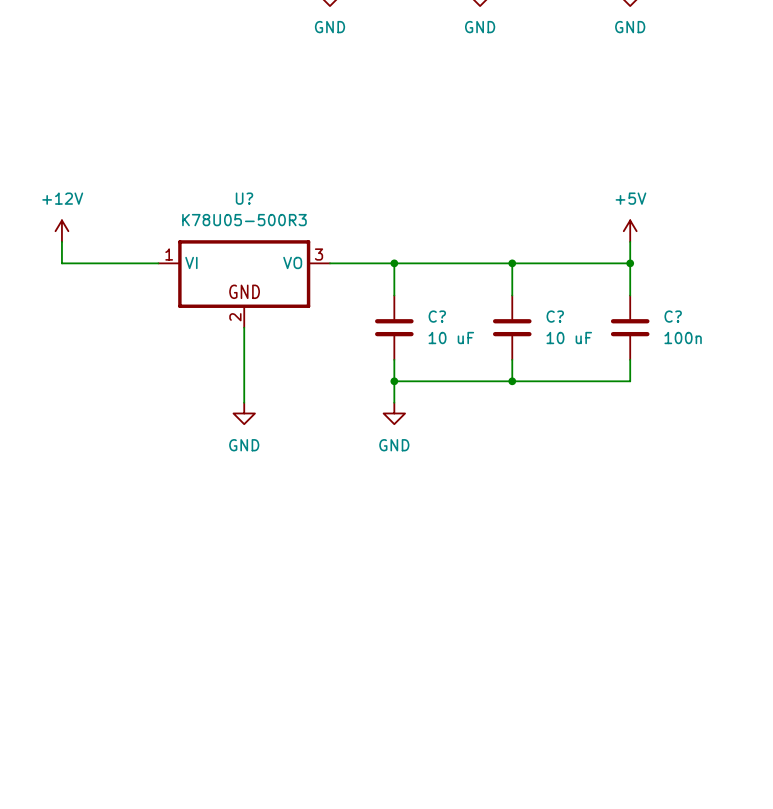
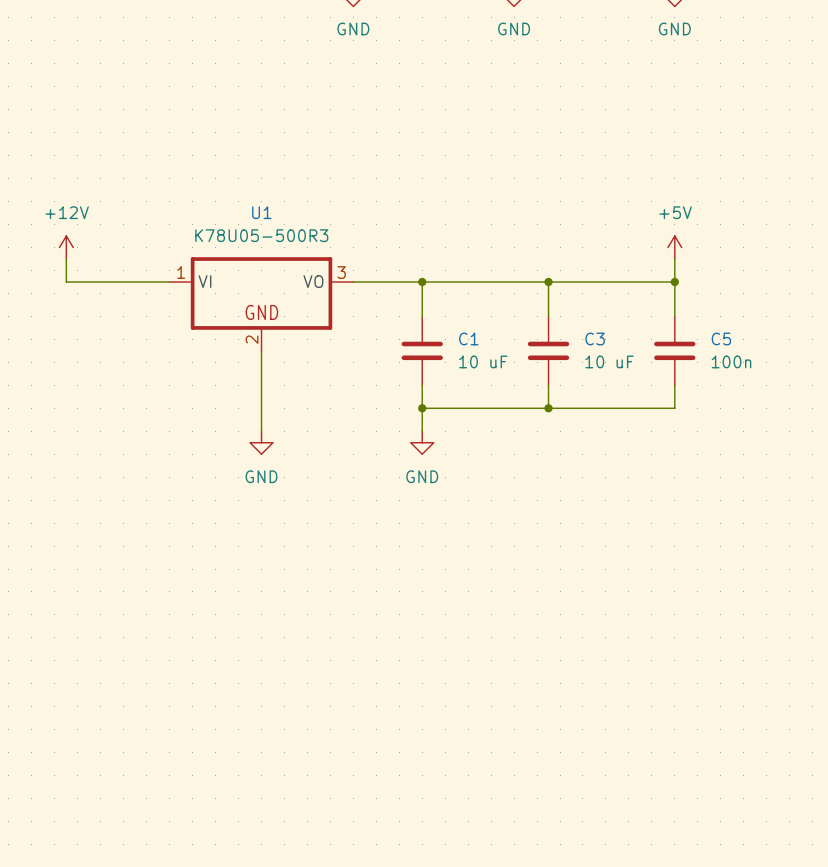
U? name: U? (244, 198) -> U1 (261, 212)
C? name: C? (437, 316) -> C1 (468, 338)
C? name: C? (555, 316) -> C3 (595, 338)
C? name: C? (673, 316) -> C5 (721, 338)

